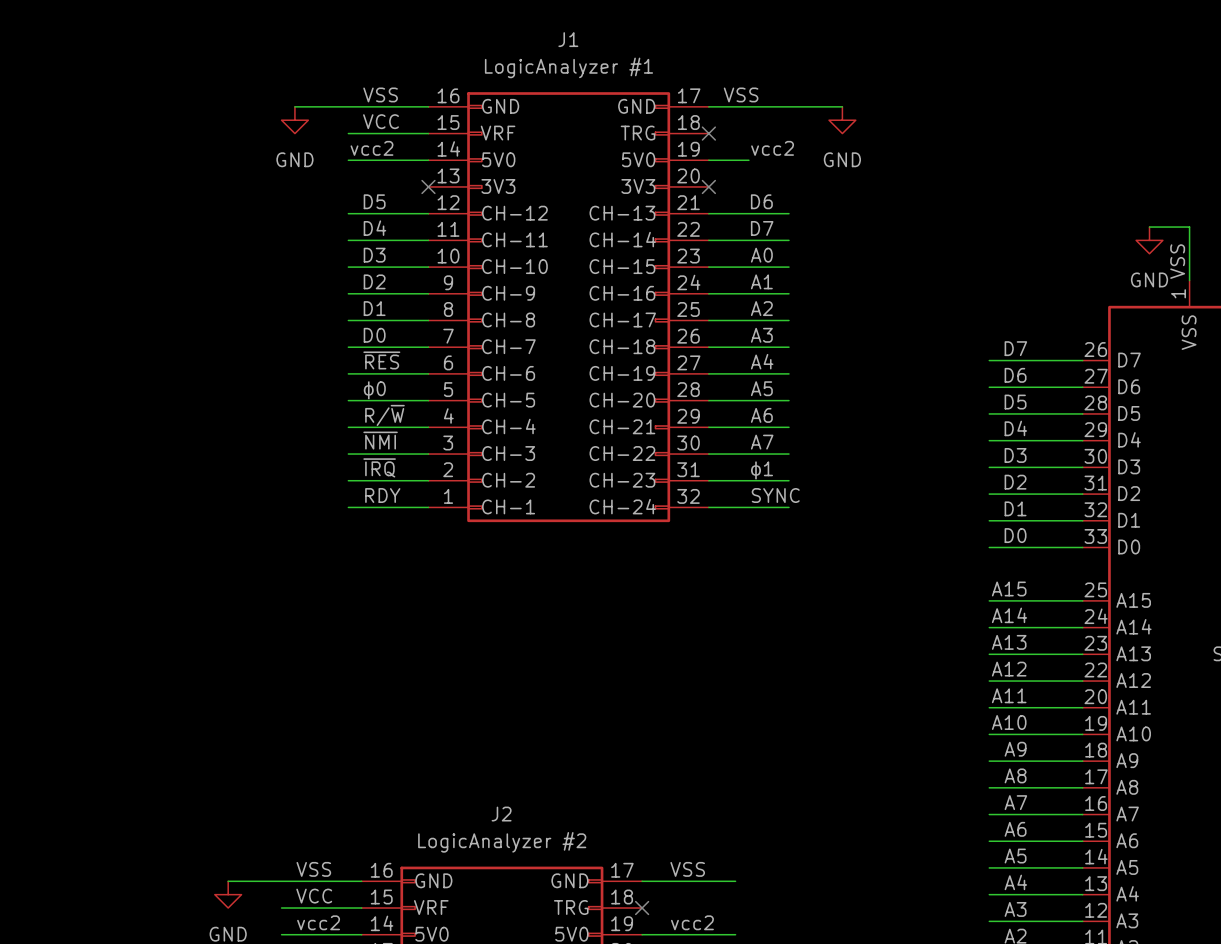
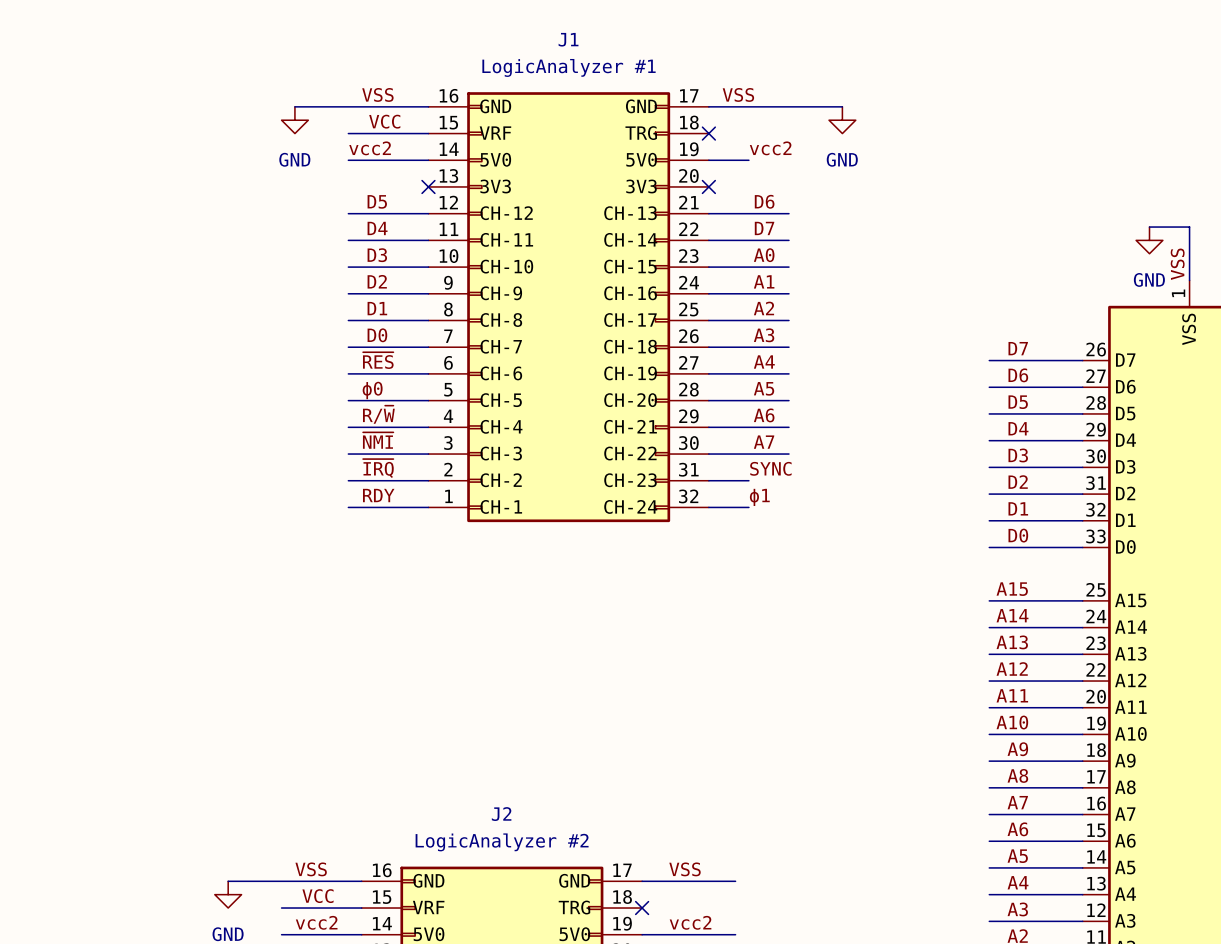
label: ϕ1 (761, 470) -> SYNC (770, 468)
wire: (748, 480) (788, 480) -> none
label: SYNC (775, 495) -> ϕ1 (759, 497)
wire: (748, 507) (788, 507) -> none

